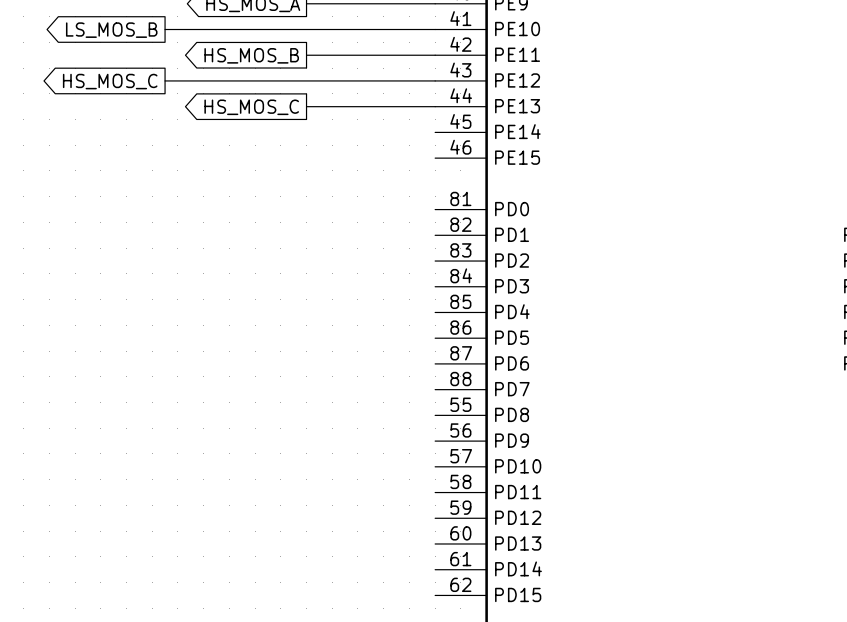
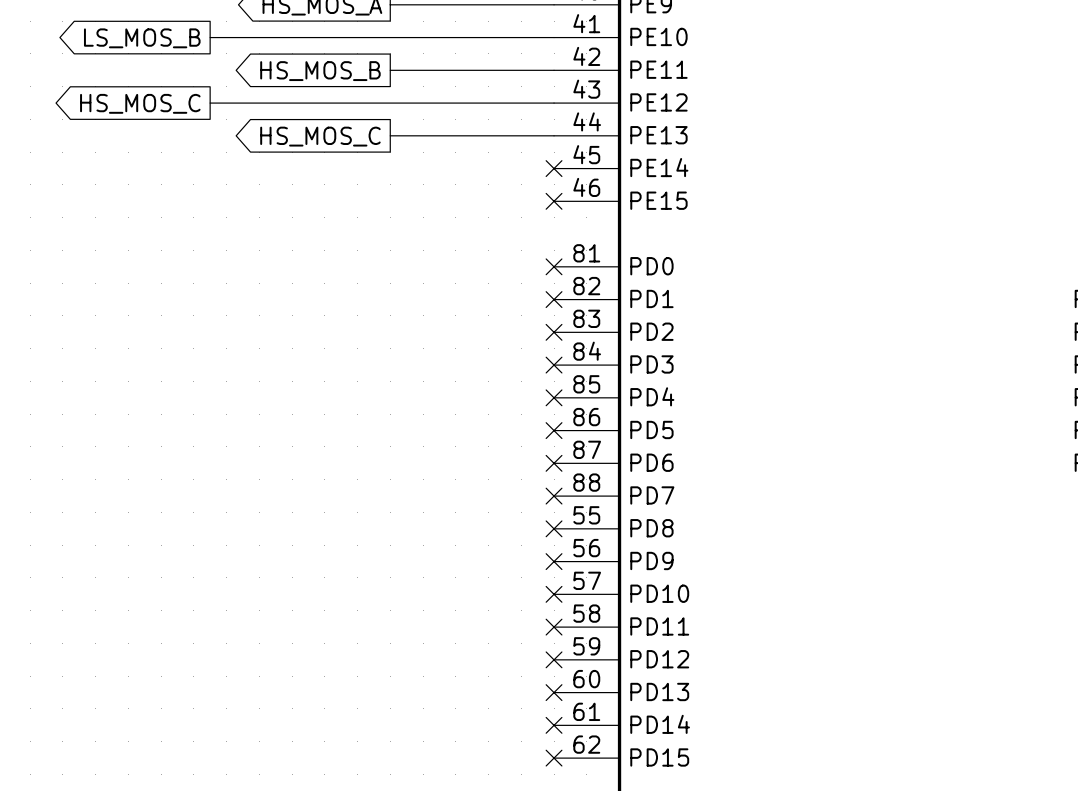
no-connect mark: none -> (554, 168)
no-connect mark: none -> (554, 201)
no-connect mark: none -> (554, 266)
no-connect mark: none -> (554, 299)
no-connect mark: none -> (554, 332)
no-connect mark: none -> (554, 365)
no-connect mark: none -> (554, 397)
no-connect mark: none -> (554, 430)
no-connect mark: none -> (554, 463)
no-connect mark: none -> (554, 496)
no-connect mark: none -> (554, 528)
no-connect mark: none -> (554, 561)
no-connect mark: none -> (554, 594)
no-connect mark: none -> (554, 627)
no-connect mark: none -> (554, 659)
no-connect mark: none -> (554, 692)
no-connect mark: none -> (554, 725)
no-connect mark: none -> (554, 758)

